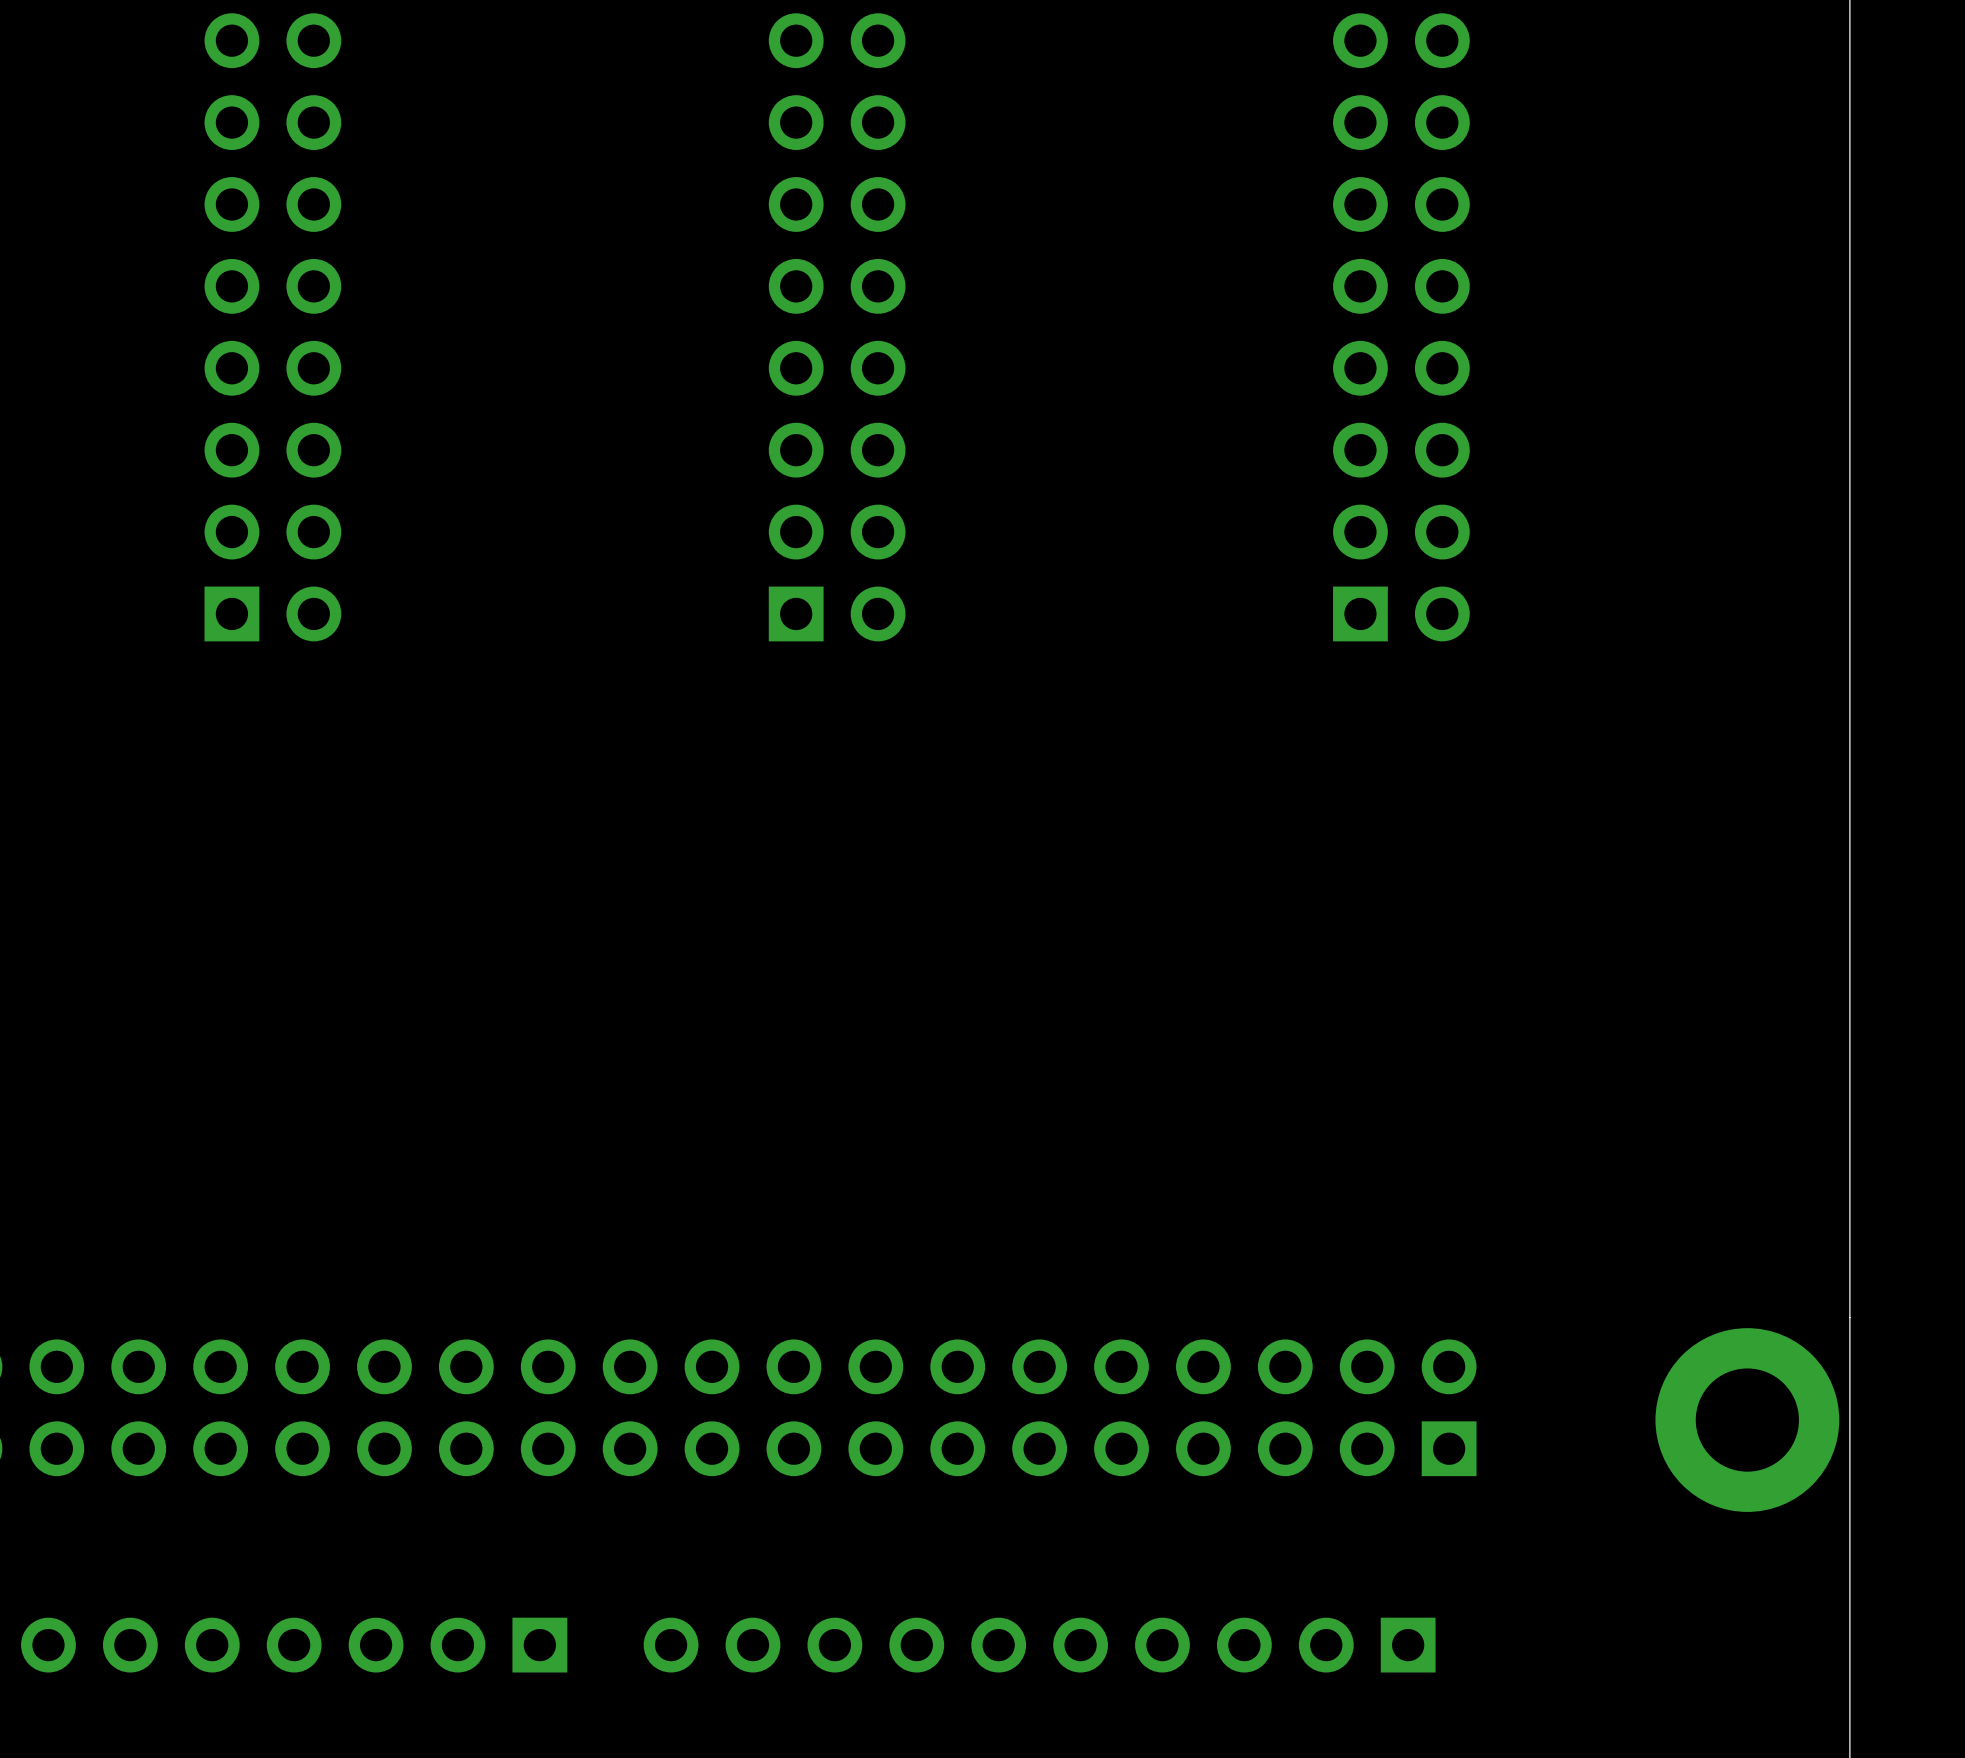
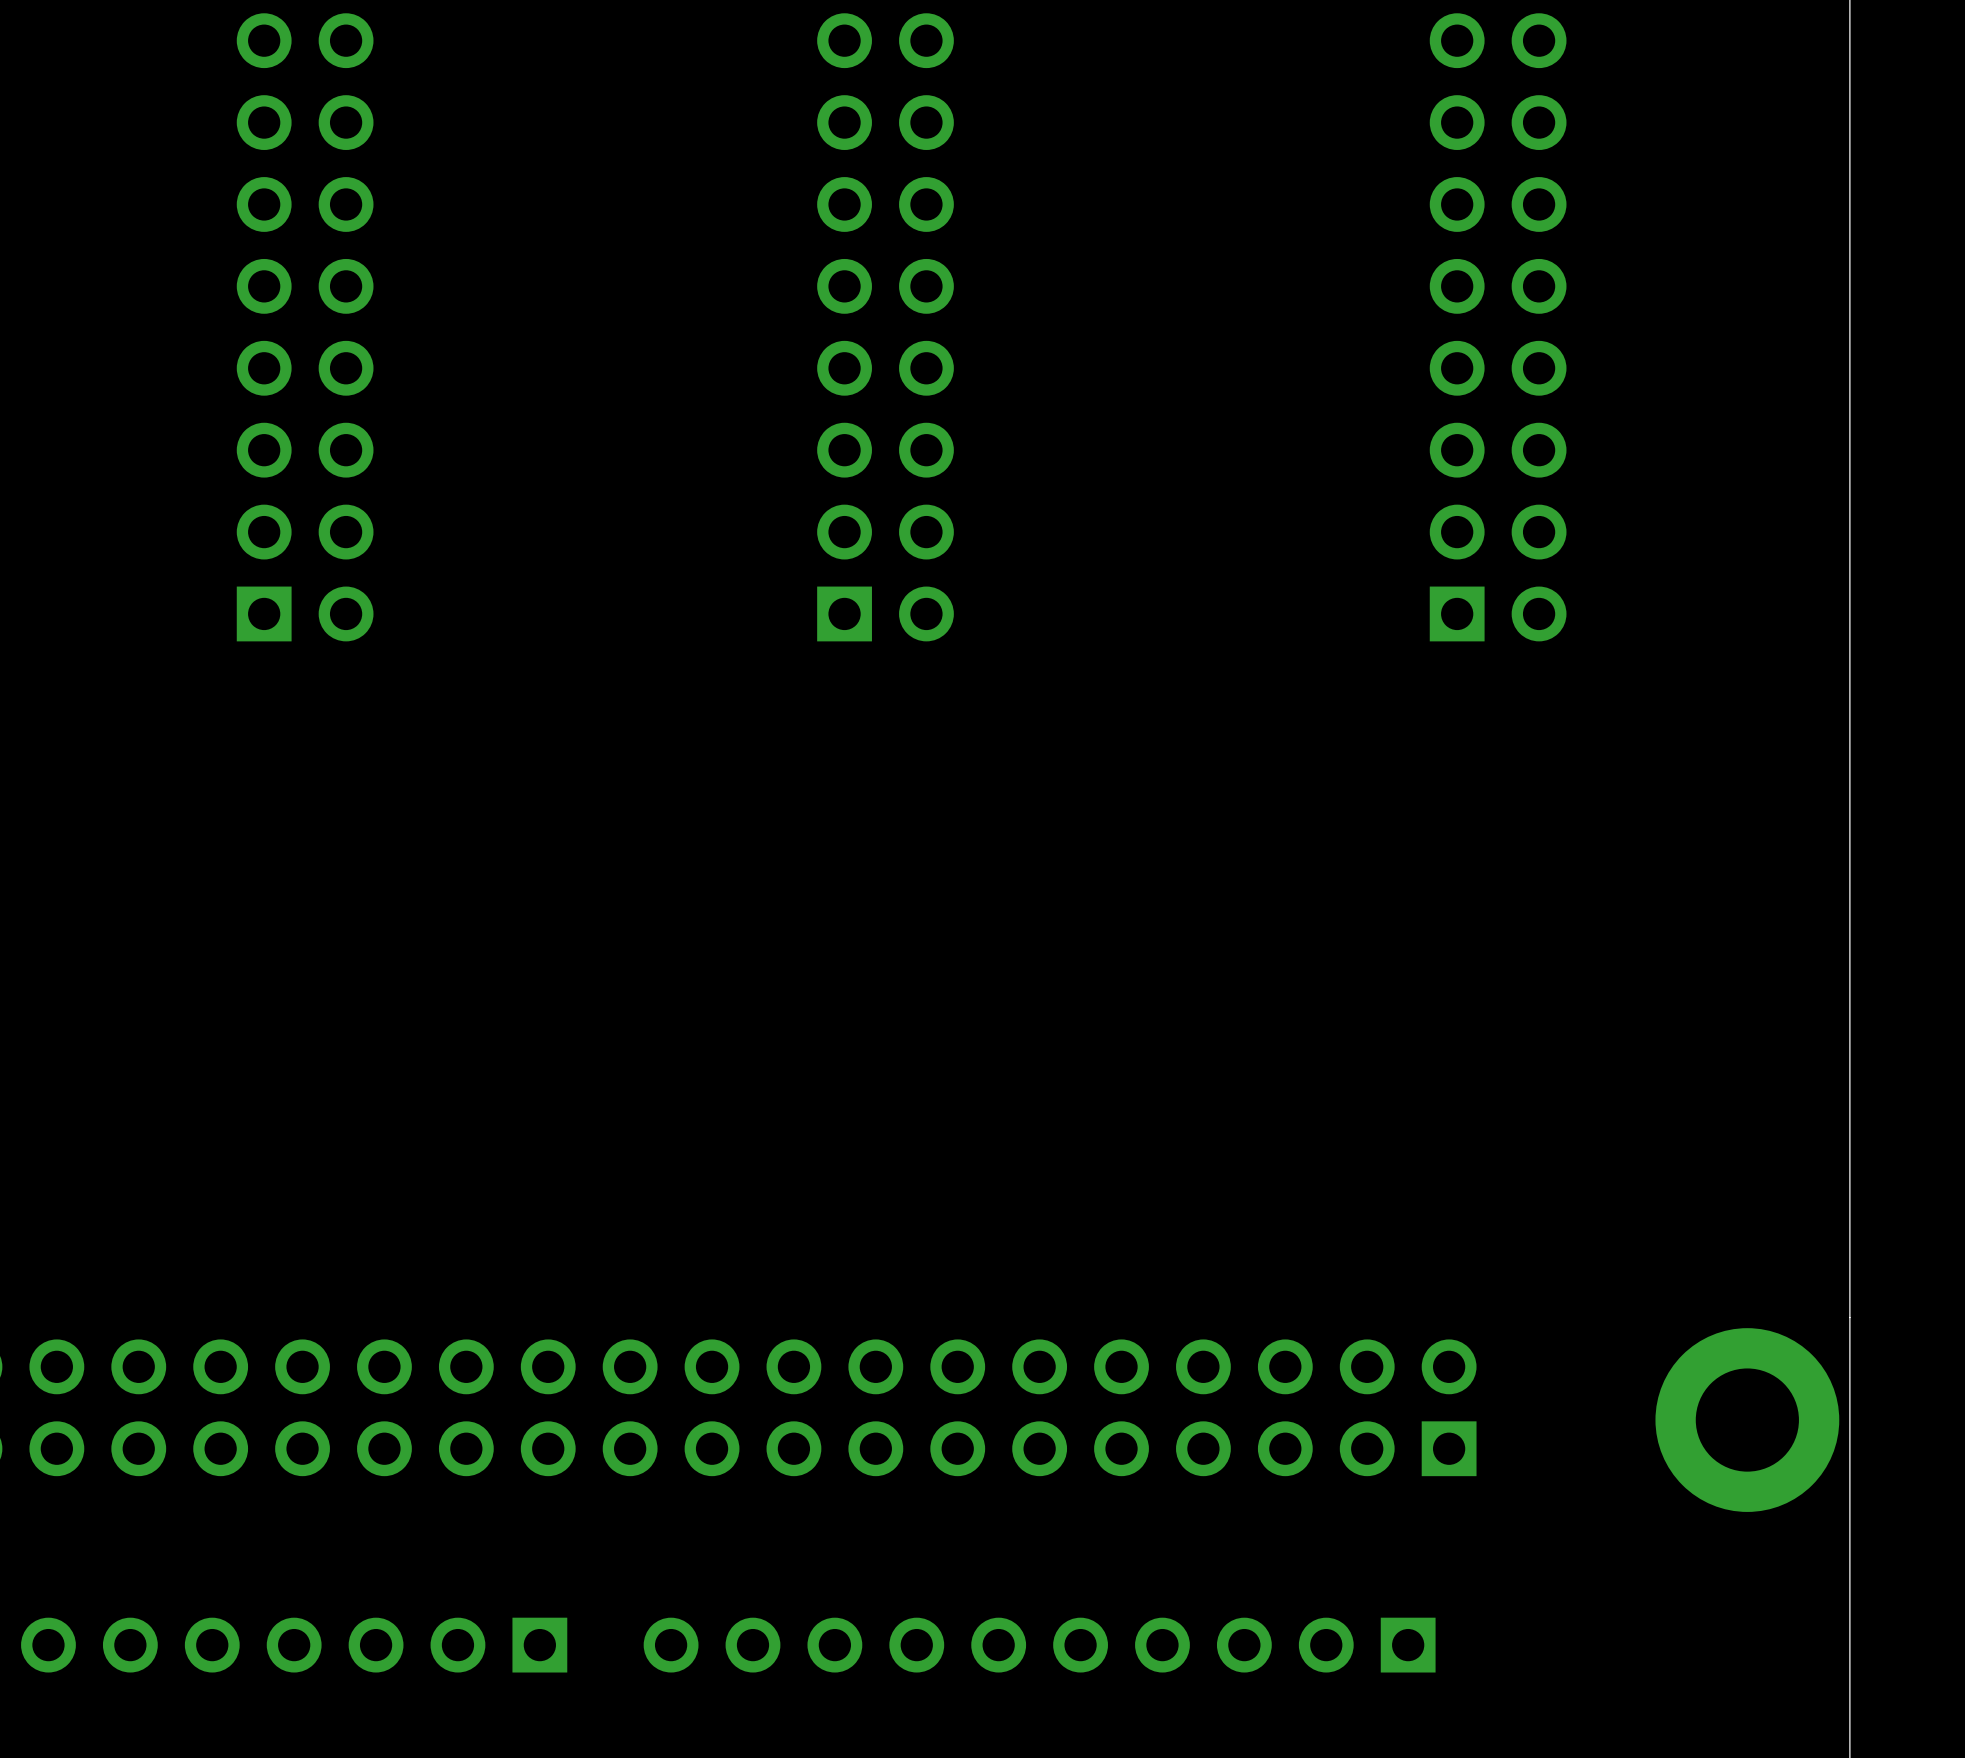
part position: (272, 327) -> (305, 327)
part position: (837, 327) -> (885, 327)
part position: (1401, 327) -> (1498, 327)

